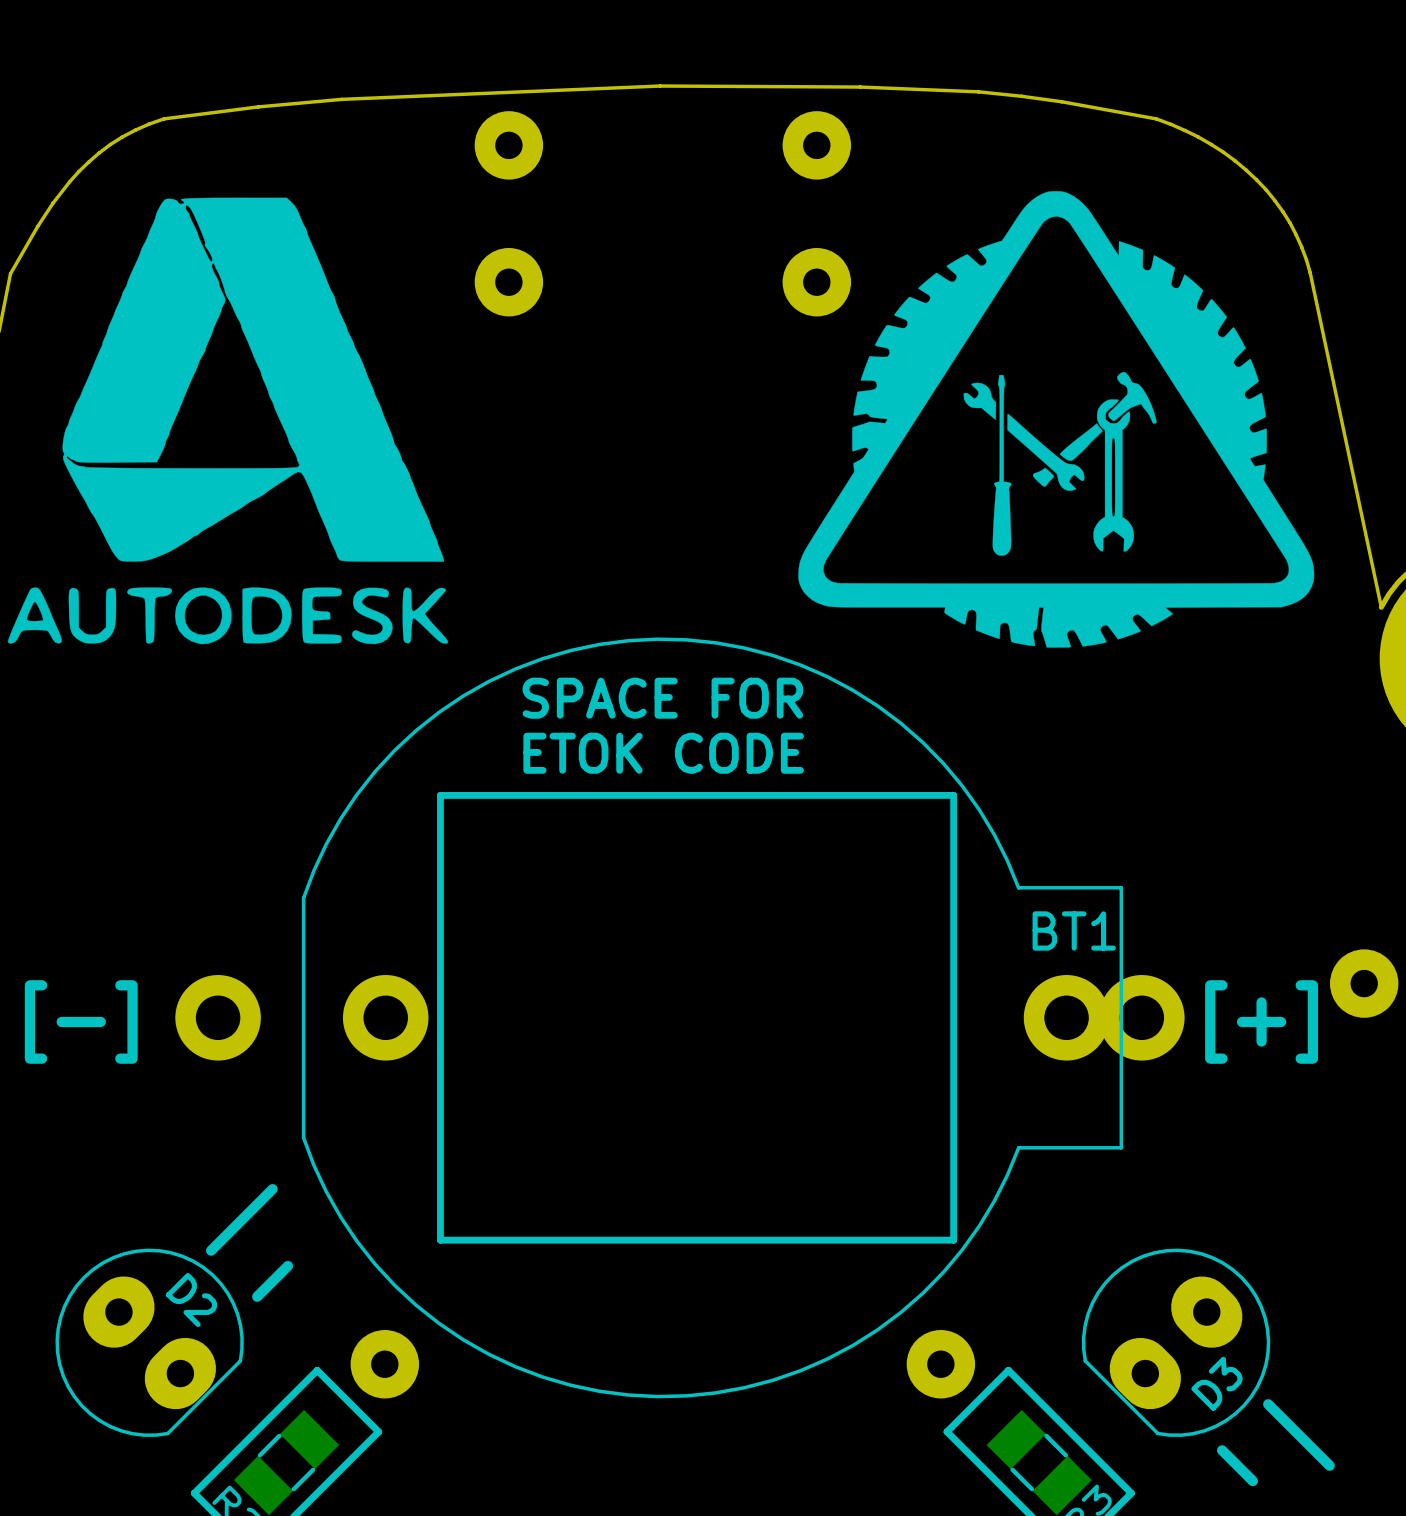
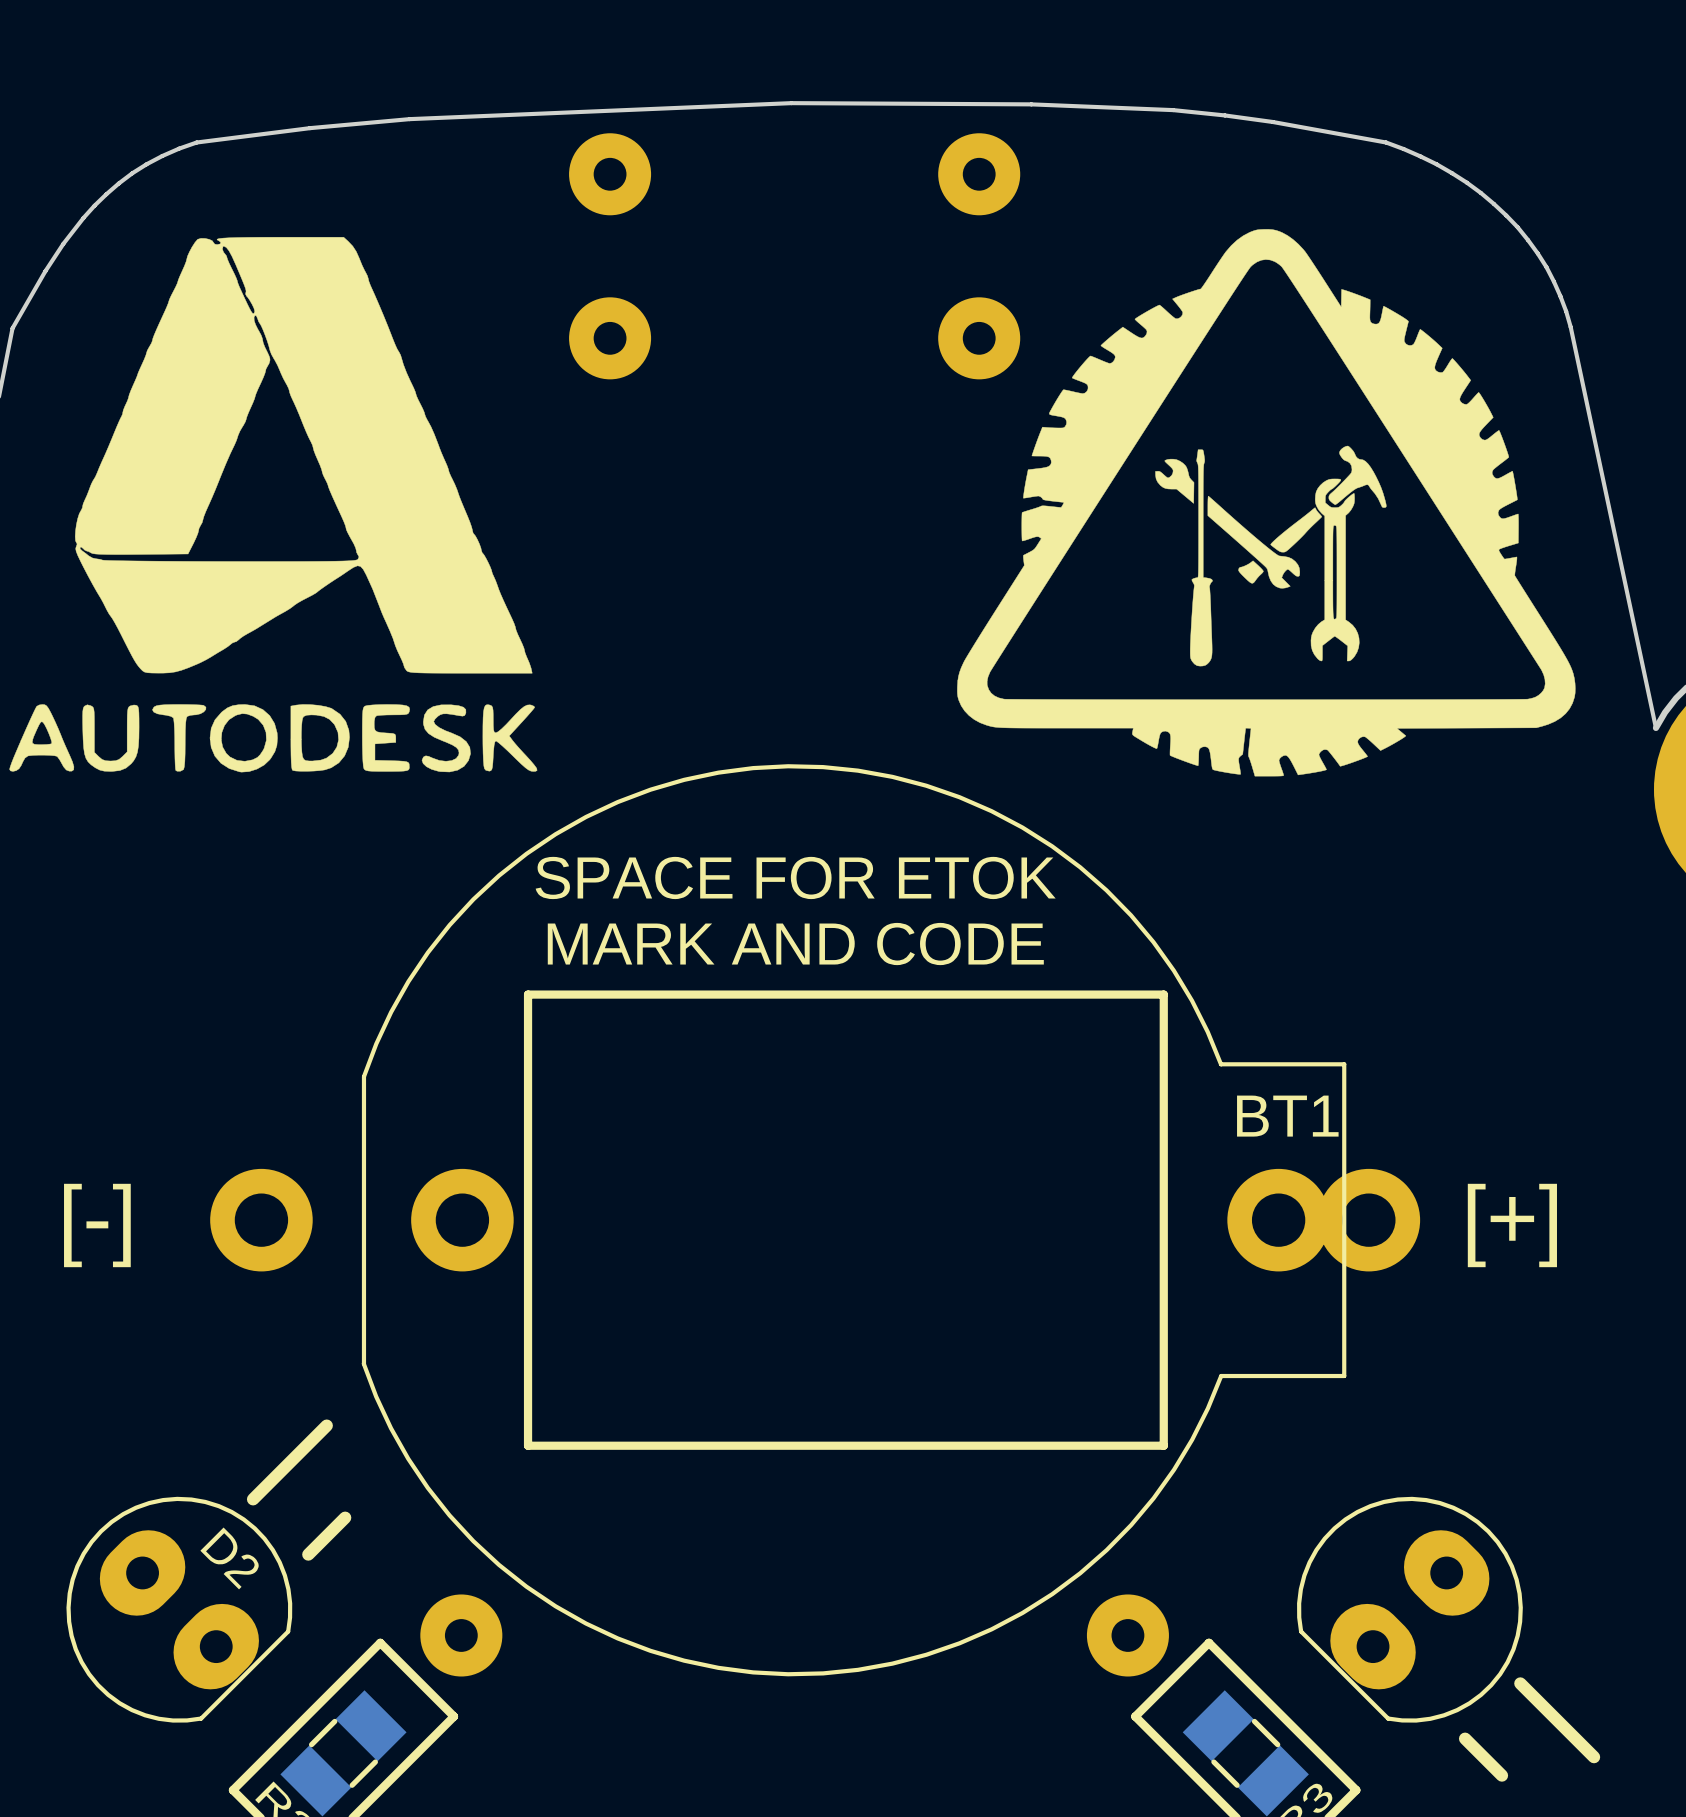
text: SPACE FOR (662, 698) -> SPACE FOR ETOK (795, 877)
text: ETOK CODE (663, 753) -> none
text: none -> MARK AND CODE (795, 944)
line: (440, 829) (440, 795) (953, 795) (953, 1240) (440, 1240) (440, 1205) -> (528, 994) (1163, 994) (1163, 1445) (528, 1445)
part: (1364, 983) -> none
D3 name: D3 (1216, 1383) -> none

